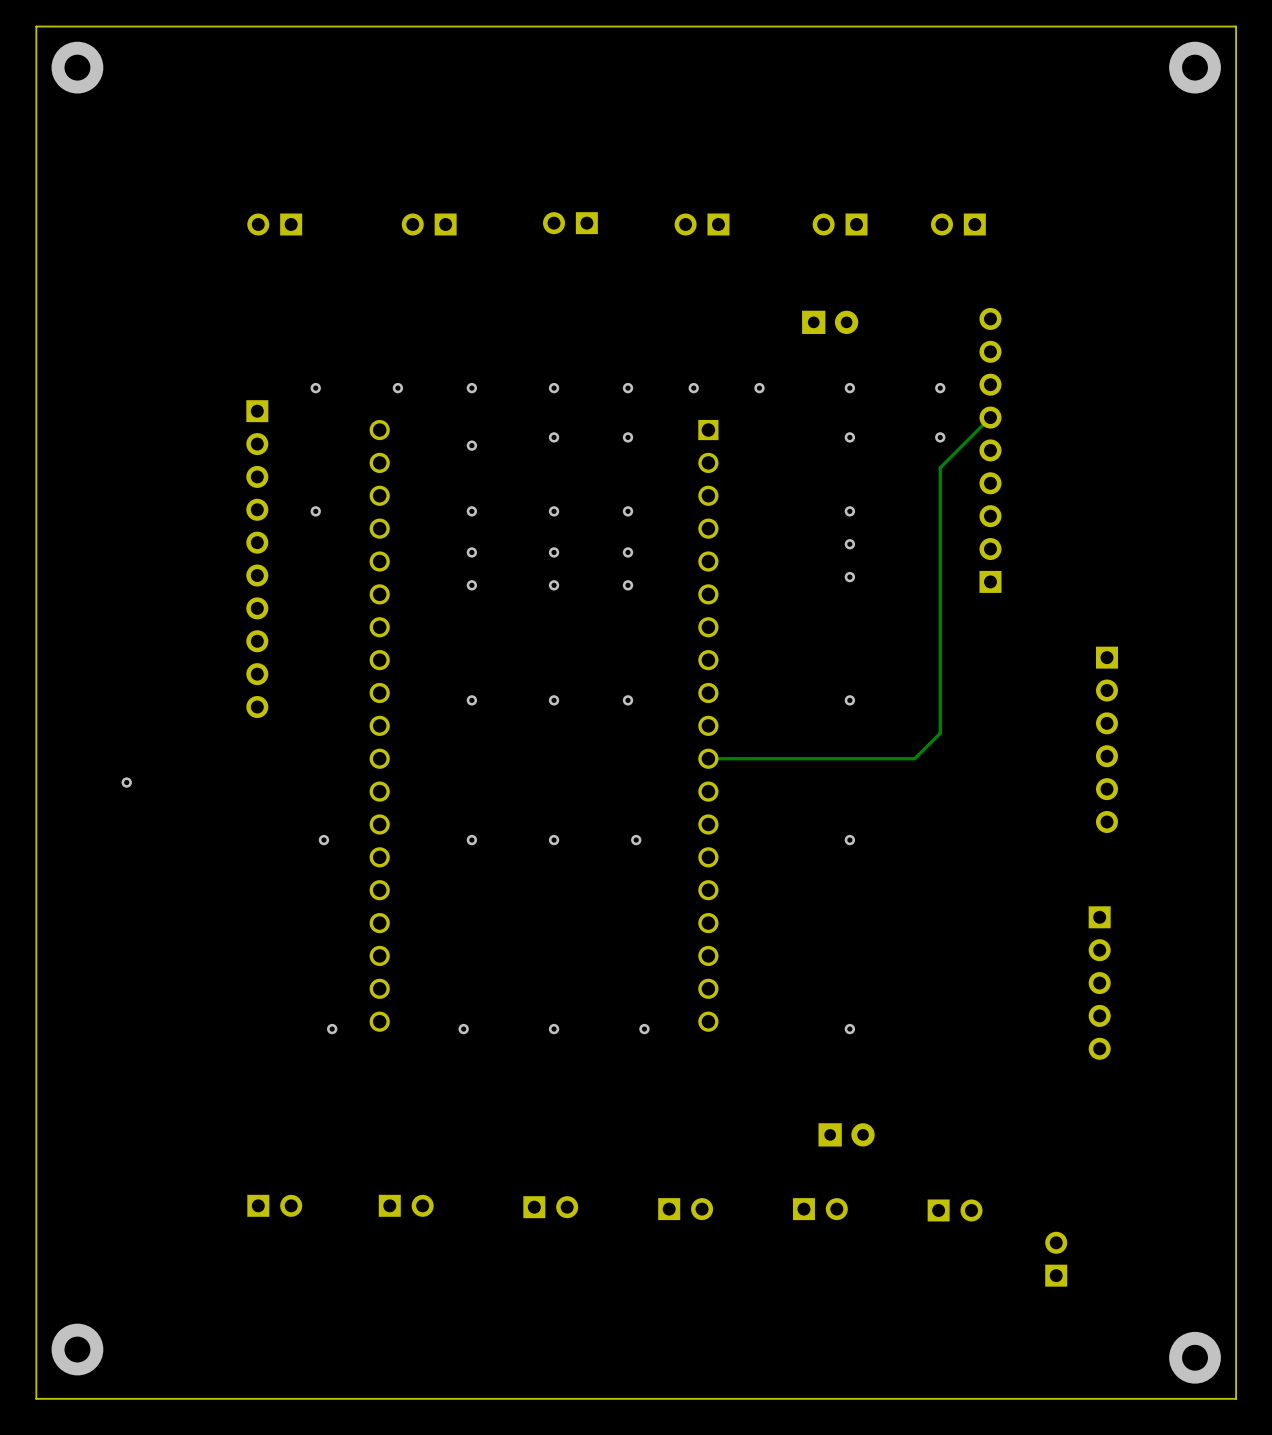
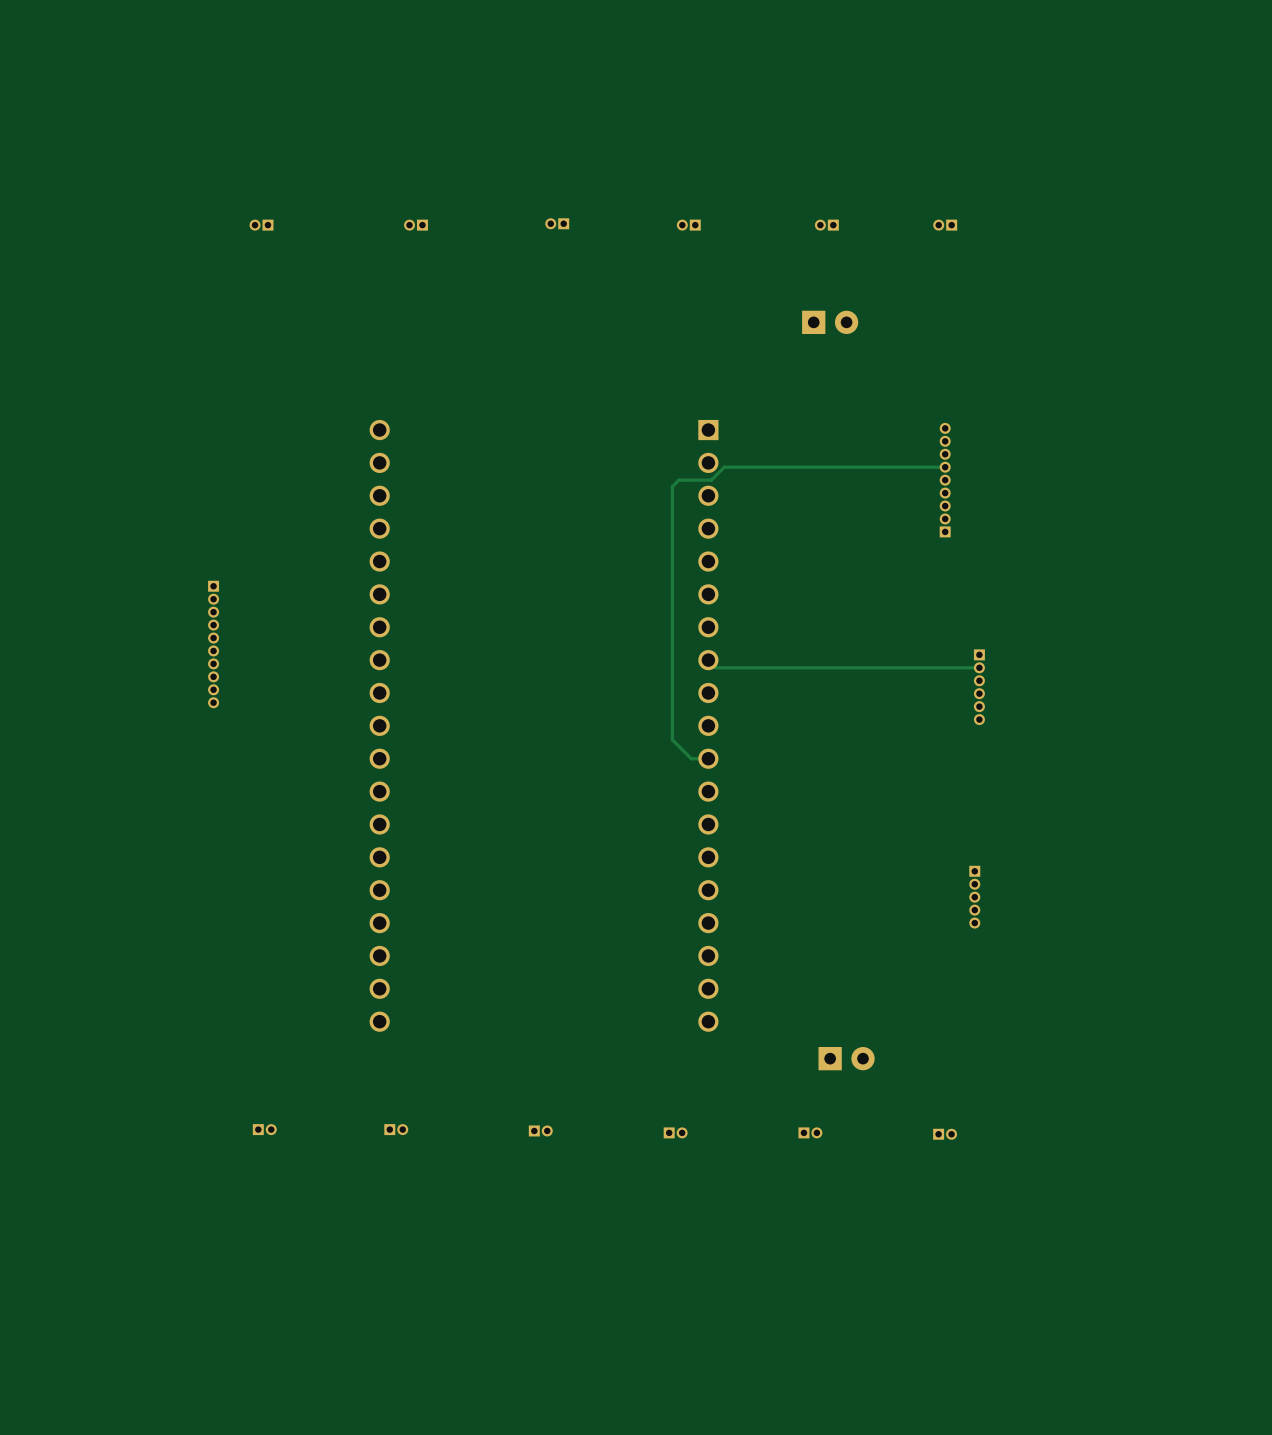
board edge: (1236, 26) (36, 26) (36, 1398) (1236, 1398) (1236, 26) -> none
via: (77, 67) -> none
via: (1195, 67) -> none
part: none -> (557, 223)
part: (570, 223) -> none
part: (274, 224) -> none
part: (429, 224) -> none
part: (702, 224) -> none
part: (840, 224) -> none
part: (958, 224) -> none
part: none -> (261, 225)
part: none -> (415, 225)
part: none -> (688, 225)
part: none -> (826, 225)
part: none -> (945, 225)
via: (315, 388) -> none
via: (397, 388) -> none
via: (471, 388) -> none
via: (554, 388) -> none
via: (628, 388) -> none
via: (693, 388) -> none
via: (759, 388) -> none
via: (849, 388) -> none
via: (940, 388) -> none
track: (990, 417) (940, 467) (940, 733) (914, 758) (708, 758) -> (945, 467) (724, 467) (711, 480) (678, 480) (672, 486) (672, 739) (691, 758) (708, 758)
via: (554, 437) -> none
via: (628, 437) -> none
via: (849, 437) -> none
via: (940, 437) -> none
via: (471, 445) -> none
part: (990, 450) -> none
part: none -> (945, 480)
via: (315, 511) -> none
via: (471, 511) -> none
via: (554, 511) -> none
via: (628, 511) -> none
via: (849, 511) -> none
via: (849, 544) -> none
via: (471, 552) -> none
via: (554, 552) -> none
via: (628, 552) -> none
part: (257, 559) -> none
via: (849, 577) -> none
via: (471, 585) -> none
via: (554, 585) -> none
via: (628, 585) -> none
part: none -> (213, 644)
track: none -> (708, 660) (716, 667) (979, 667)
part: none -> (979, 687)
via: (471, 700) -> none
via: (554, 700) -> none
via: (628, 700) -> none
via: (849, 700) -> none
part: (1106, 739) -> none
via: (126, 782) -> none
via: (323, 840) -> none
via: (471, 840) -> none
via: (554, 840) -> none
via: (636, 840) -> none
via: (849, 840) -> none
part: none -> (974, 897)
part: (1099, 983) -> none
via: (332, 1029) -> none
via: (463, 1029) -> none
via: (554, 1029) -> none
via: (644, 1029) -> none
via: (849, 1029) -> none
part: none -> (264, 1129)
part: none -> (396, 1129)
part: none -> (540, 1130)
part: none -> (675, 1132)
part: none -> (810, 1132)
part position: (846, 1134) -> (846, 1058)
part: none -> (945, 1134)
part: (274, 1205) -> none
part: (406, 1205) -> none
part: (550, 1207) -> none
part: (685, 1209) -> none
part: (820, 1209) -> none
part: (955, 1210) -> none
part: (1056, 1259) -> none
via: (77, 1349) -> none
via: (1195, 1357) -> none

